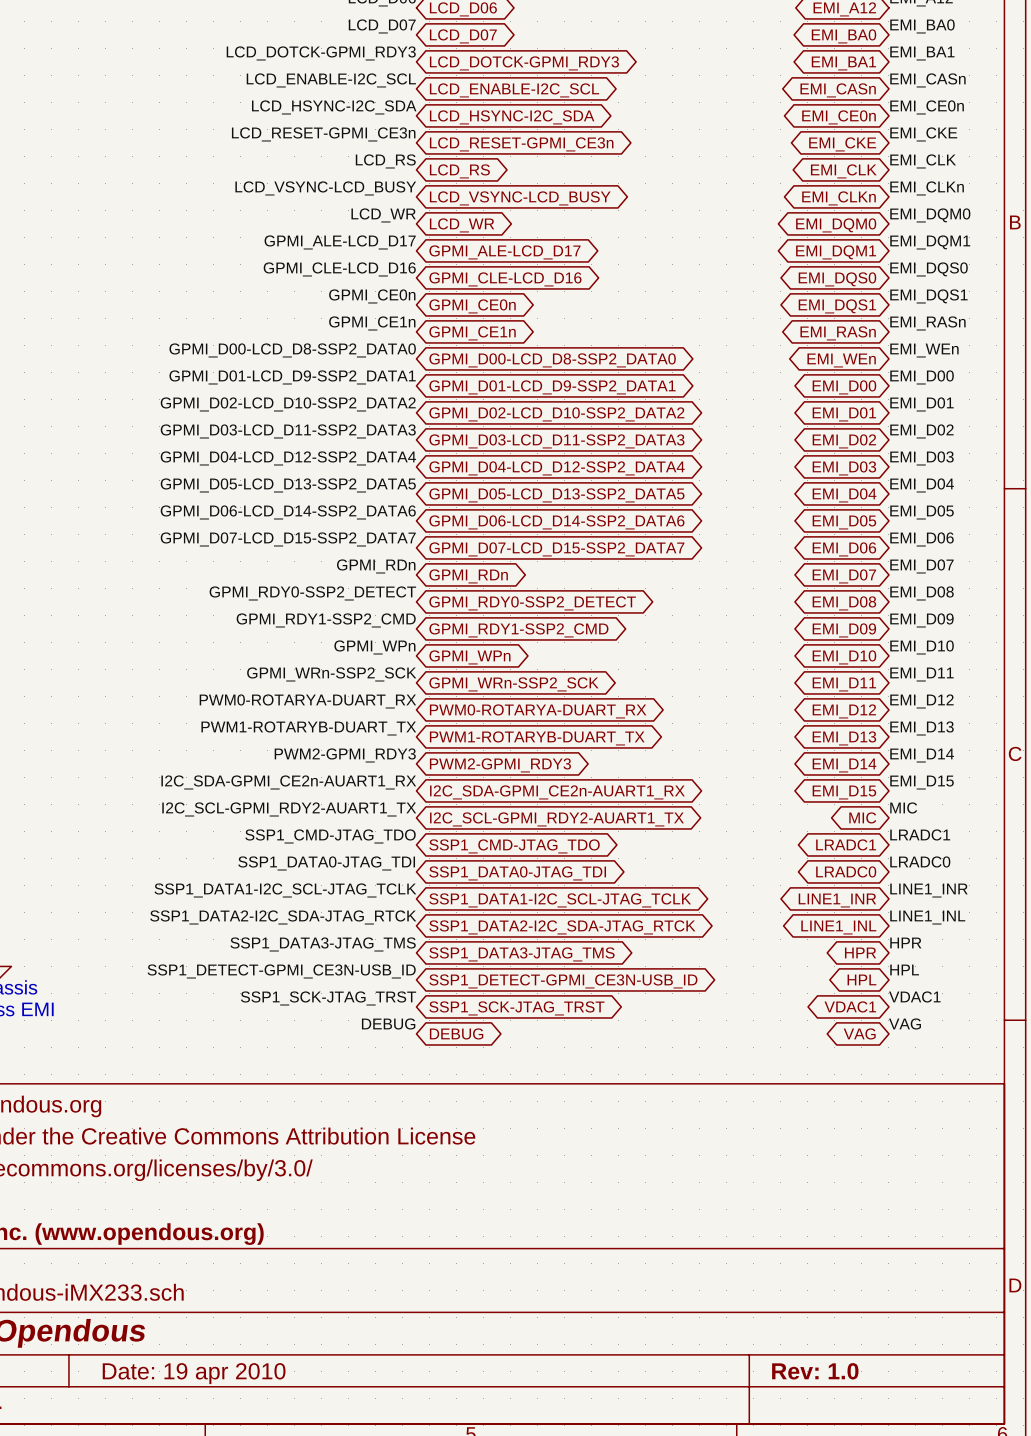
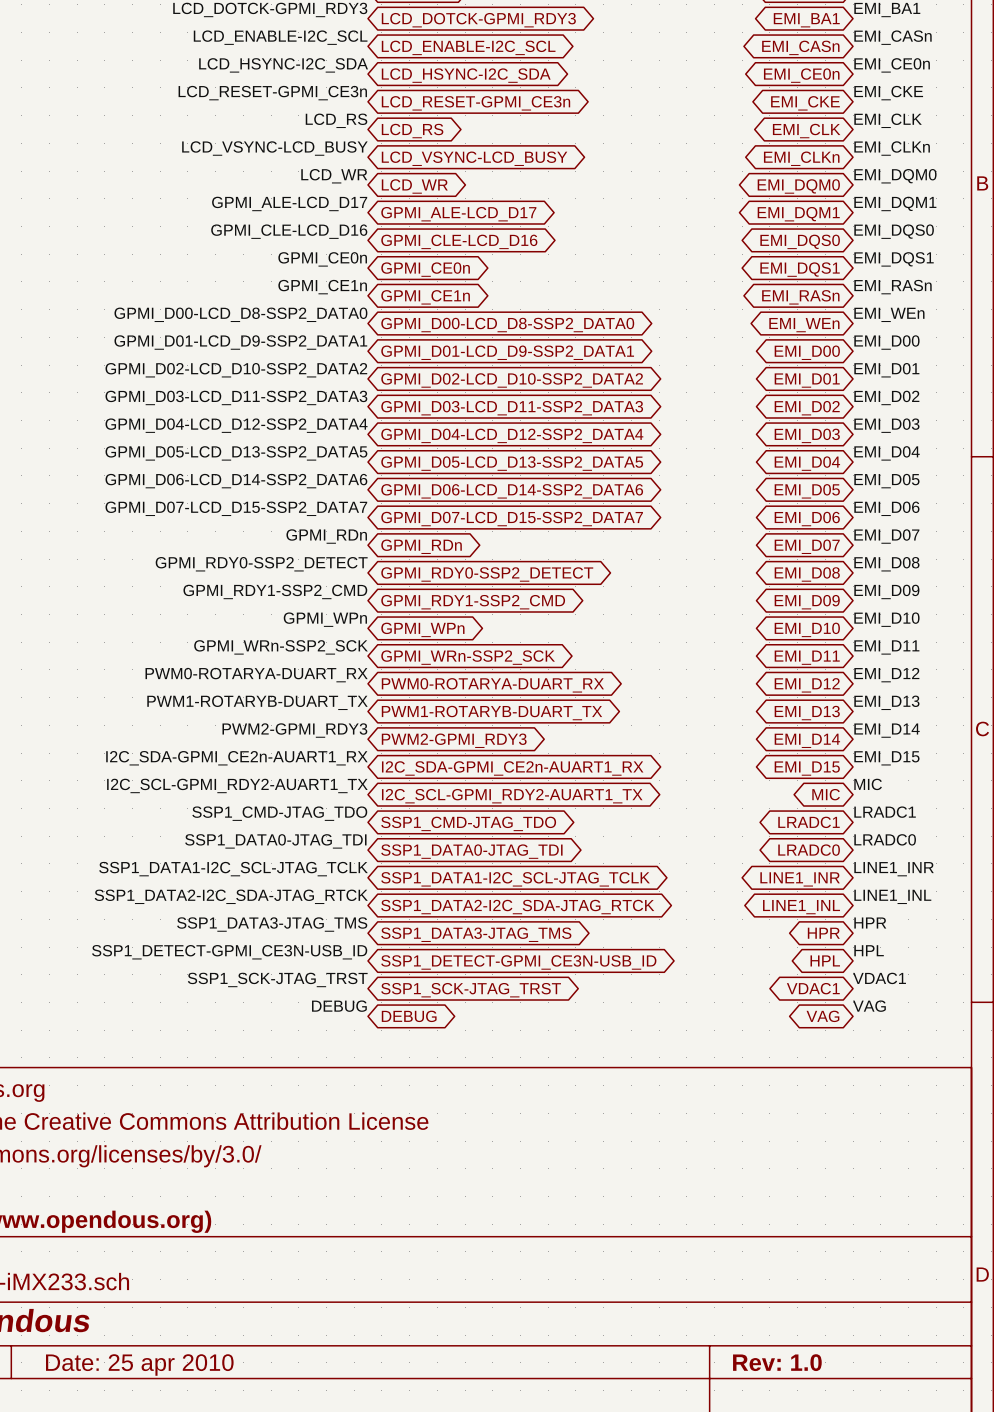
title block: Date: 19 apr 2010 (194, 1373) -> Date: 25 apr 2010 (139, 1365)

